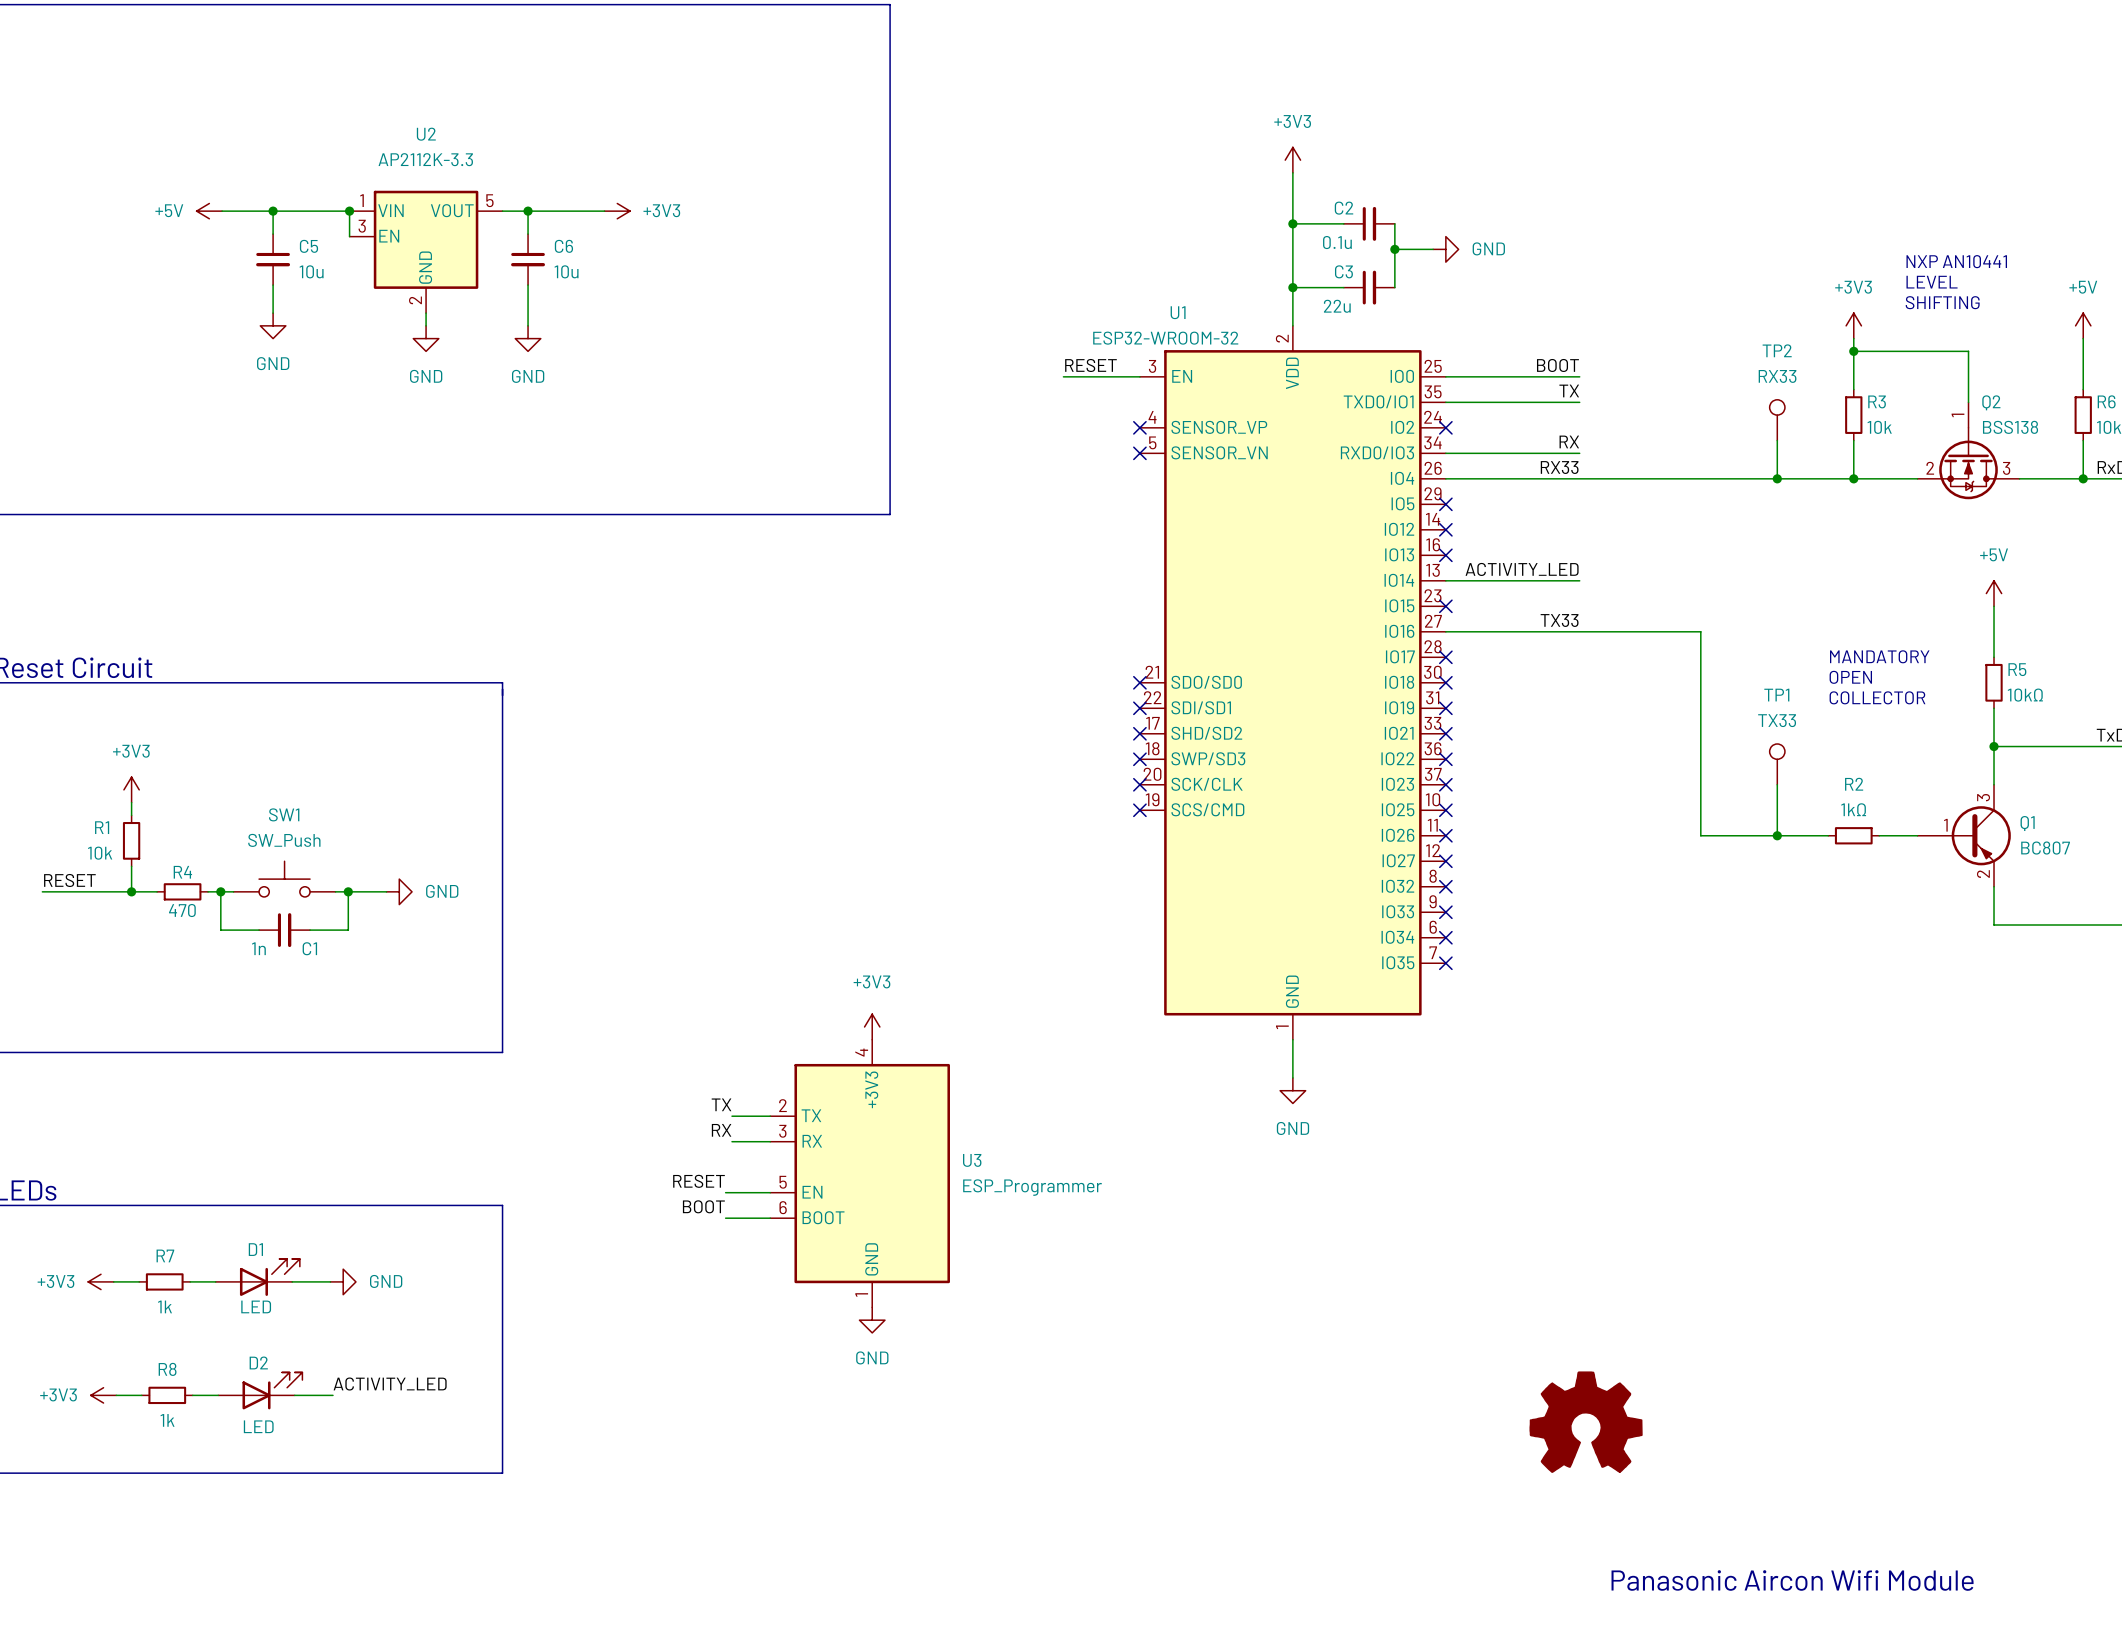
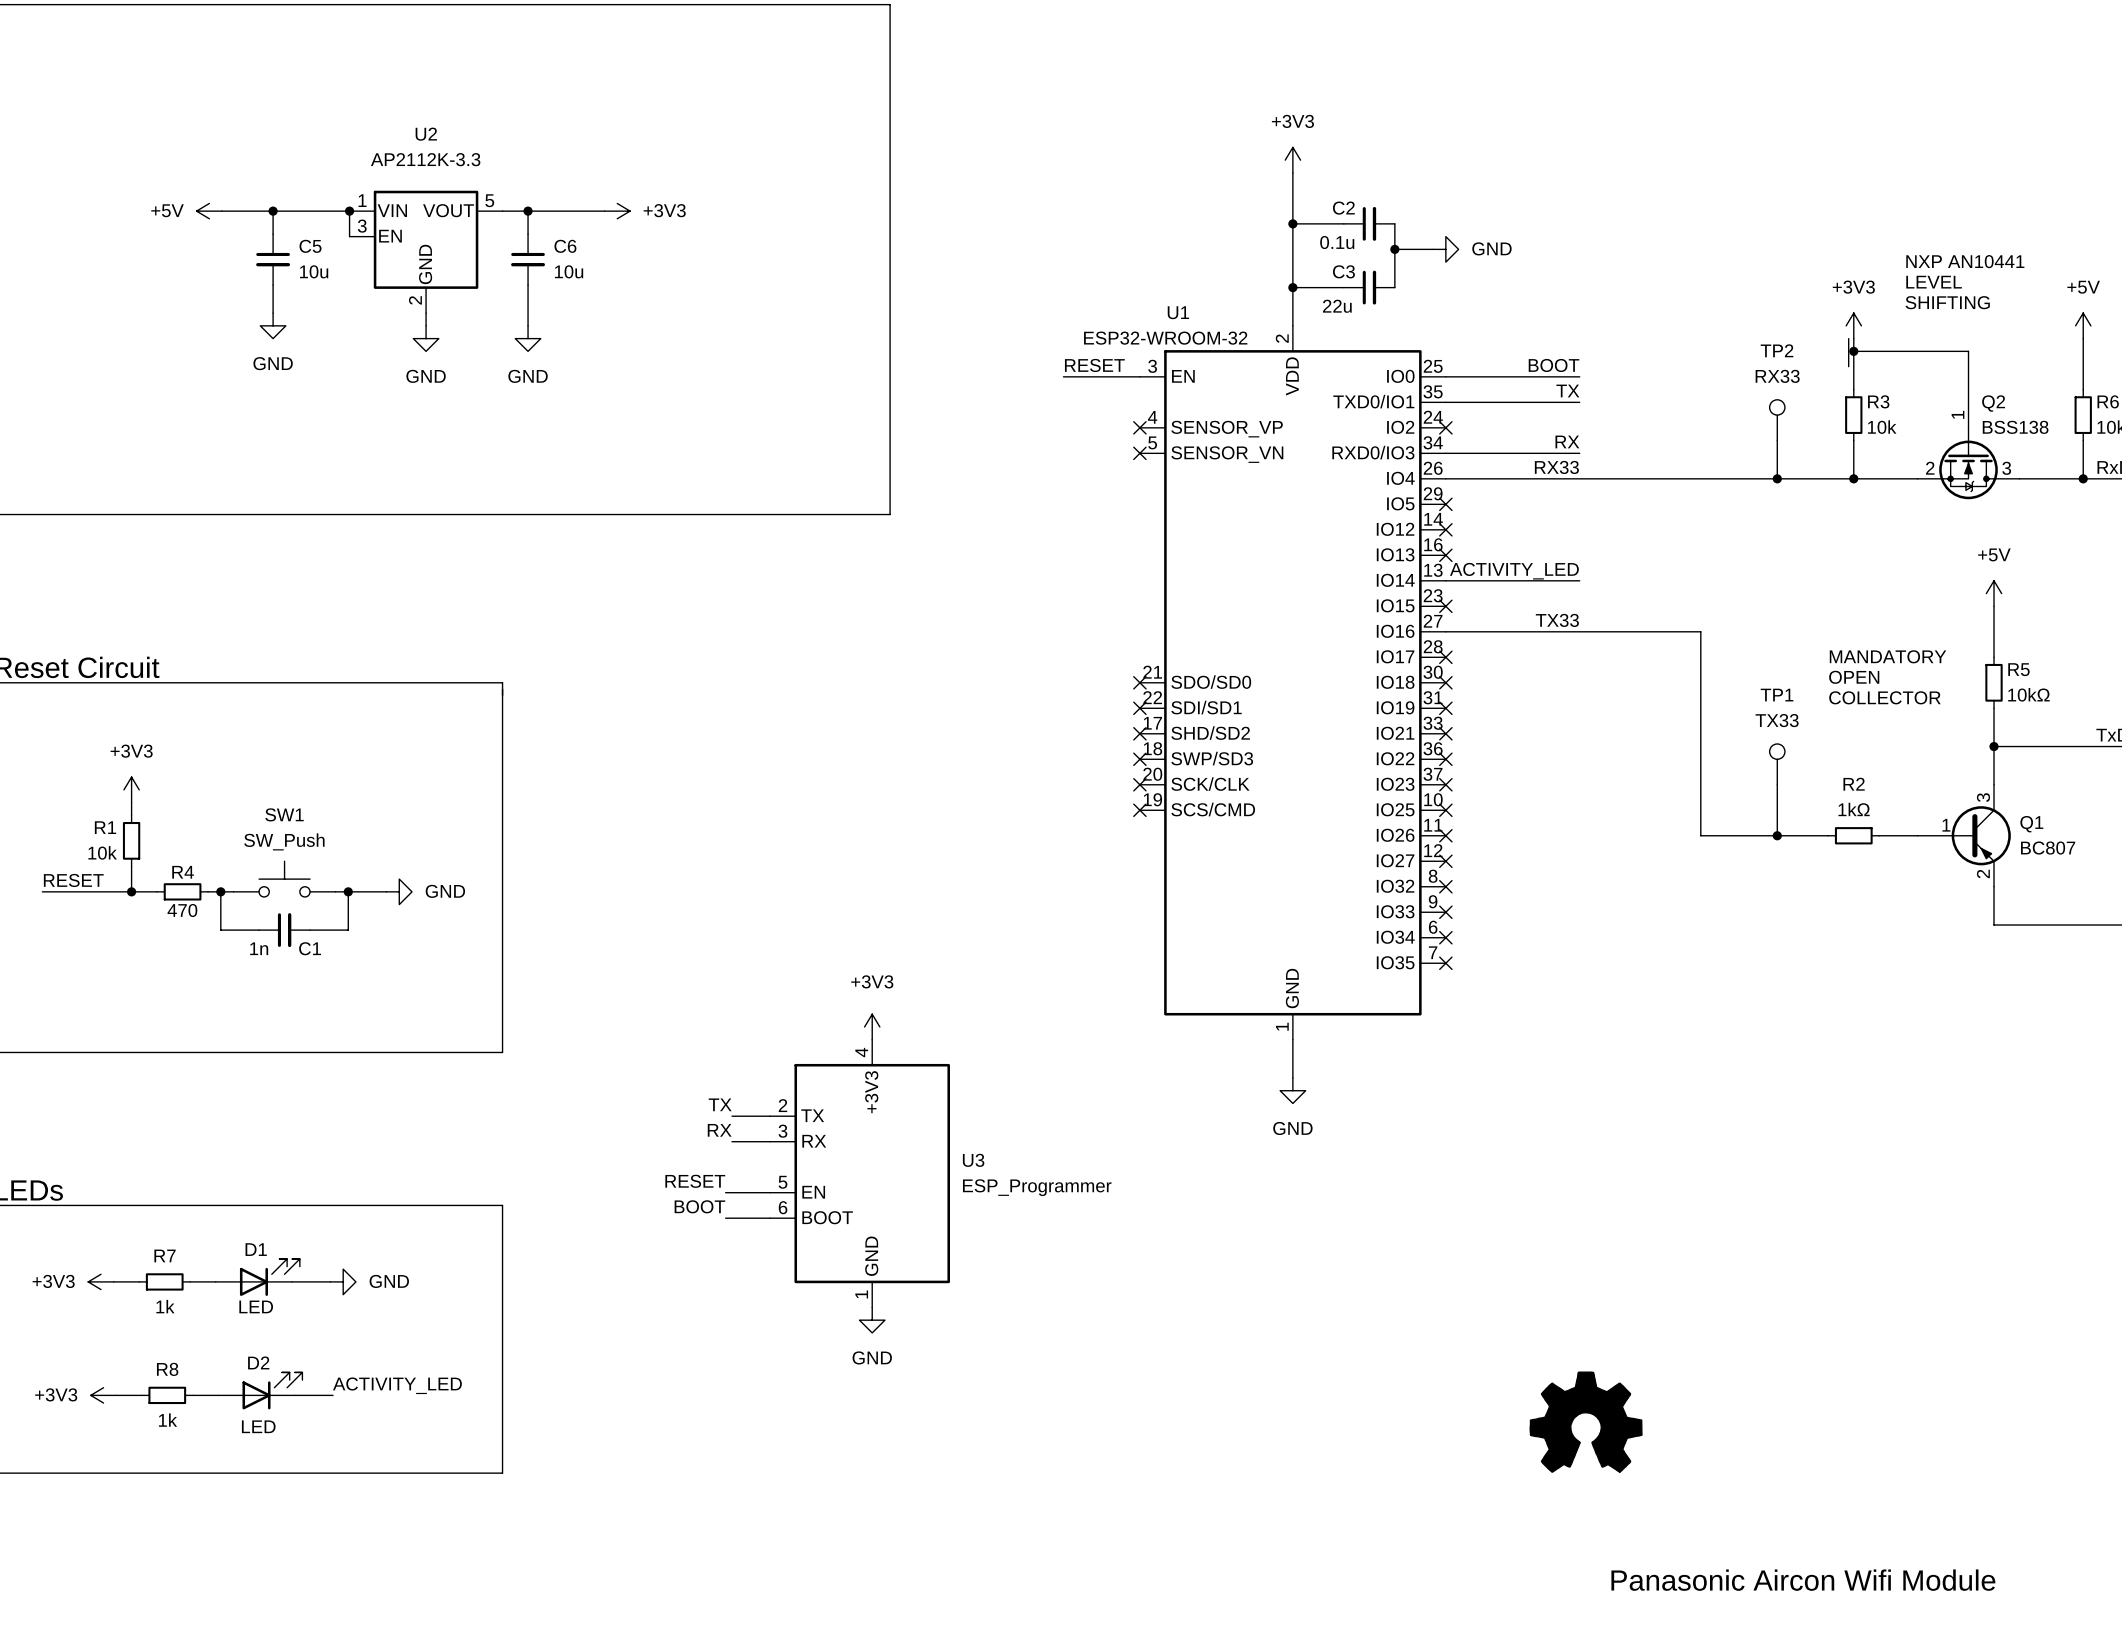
wire: none -> (1848, 338) (1848, 366)

